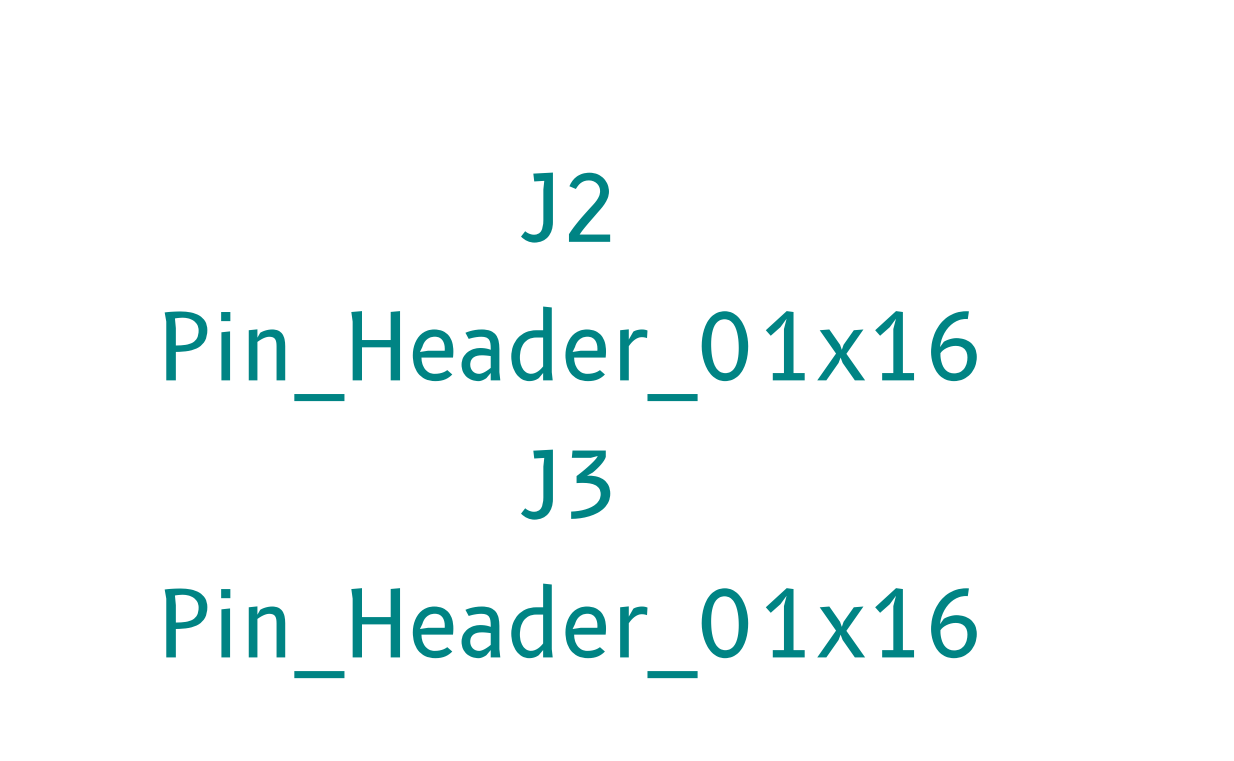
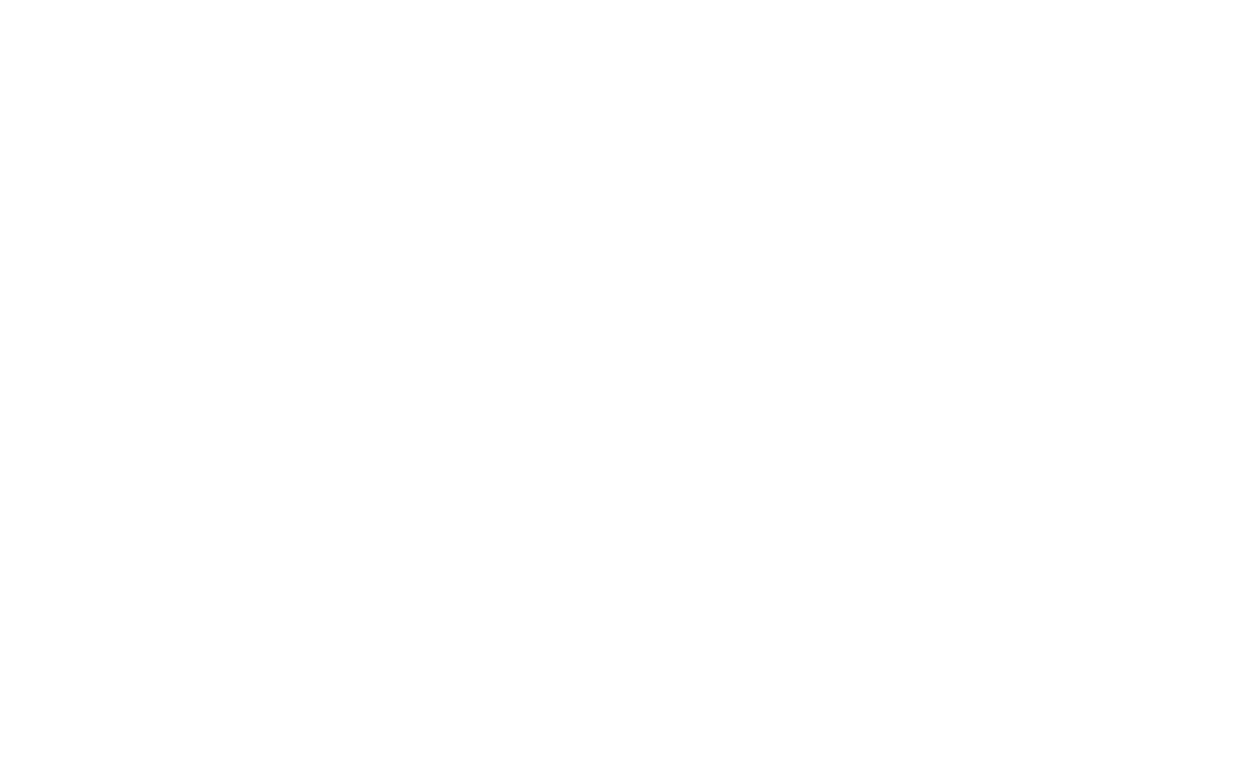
J2: Pin_Header_01x16 (570, 286) -> none
J3: Pin_Header_01x16 (570, 563) -> none

